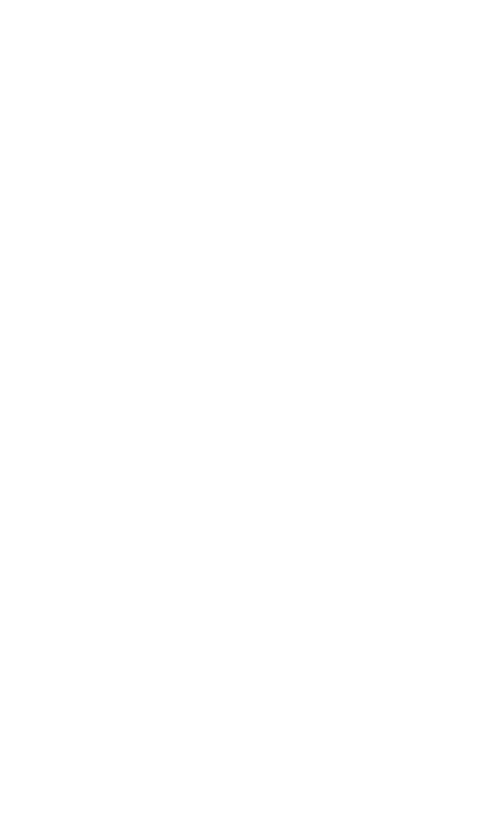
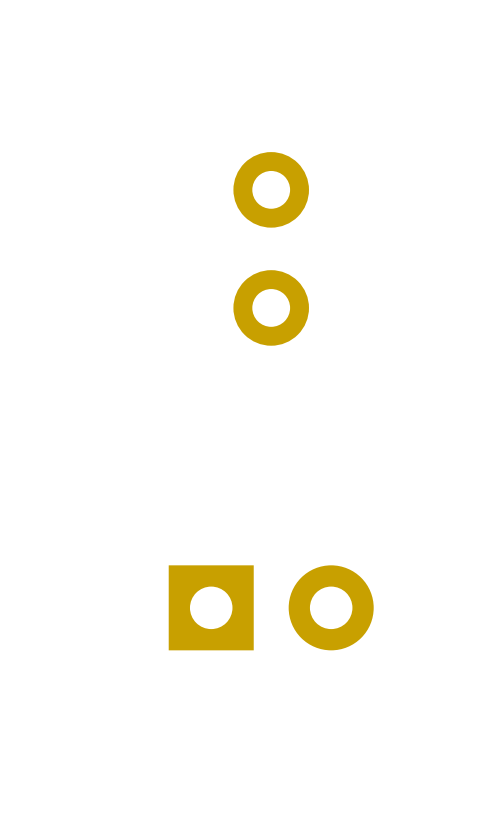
part: none -> (271, 248)
part: none -> (271, 607)

